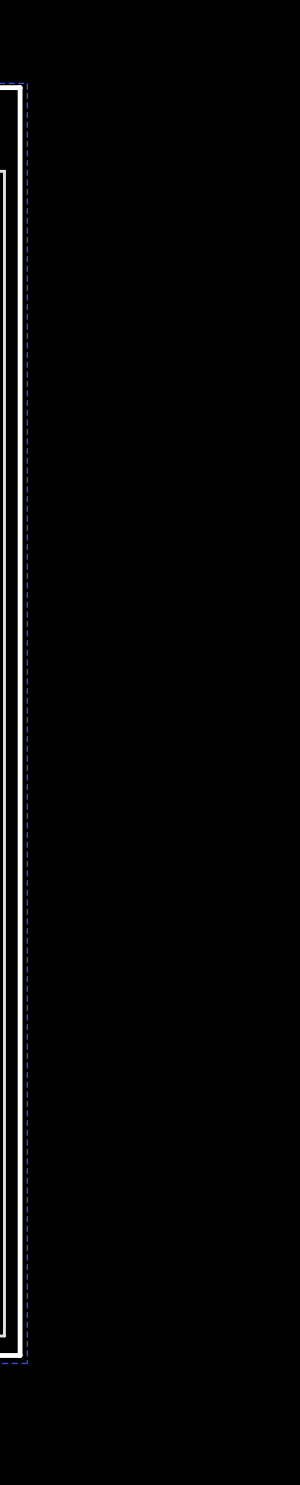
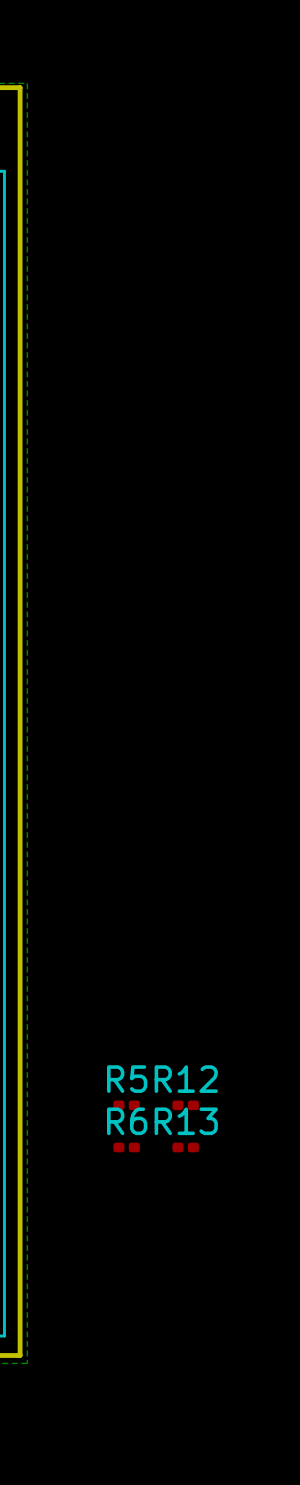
R5: none -> (126, 1105)
R12: none -> (185, 1105)
R6: none -> (126, 1147)
R13: none -> (185, 1147)

